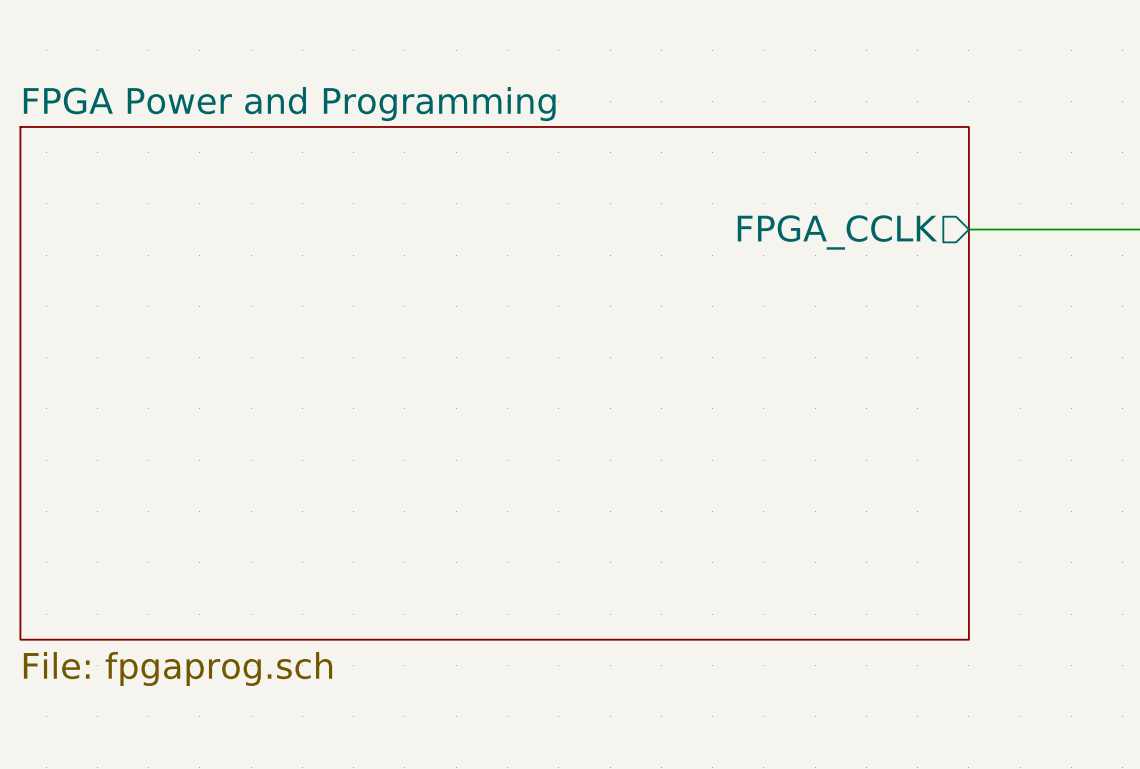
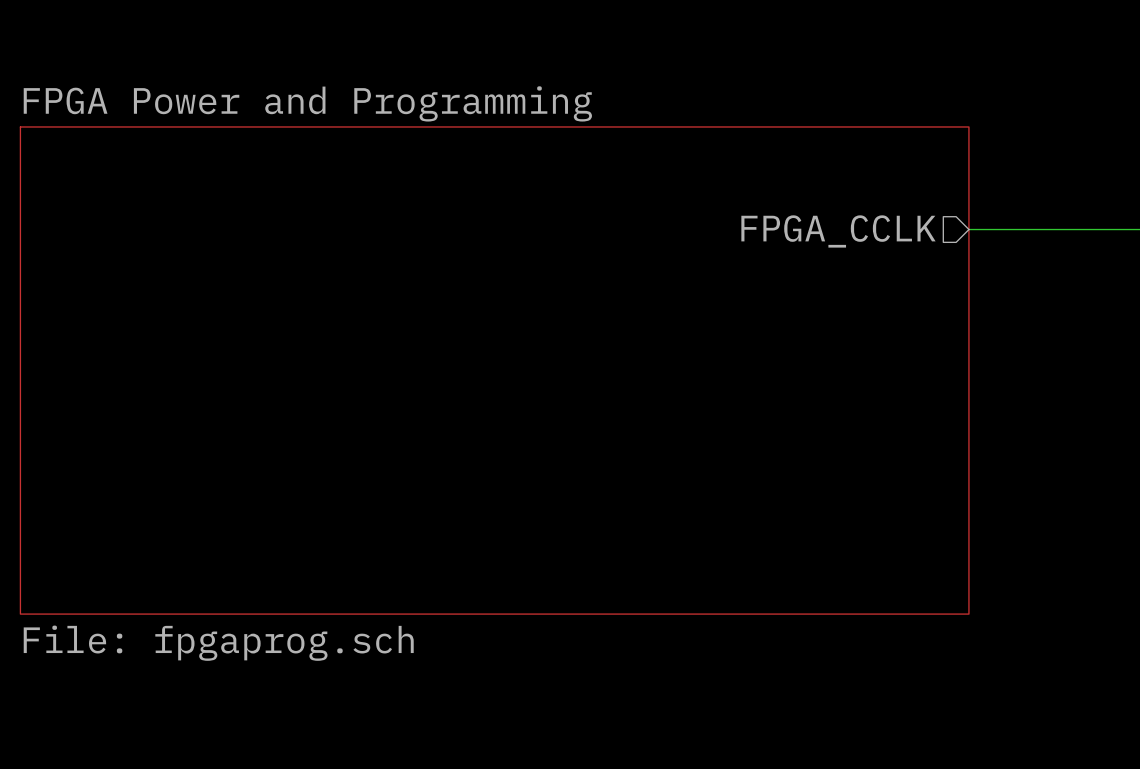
sheet FPGA Power and Programming shape: [20, 126, 969, 640] -> [20, 126, 969, 615]

